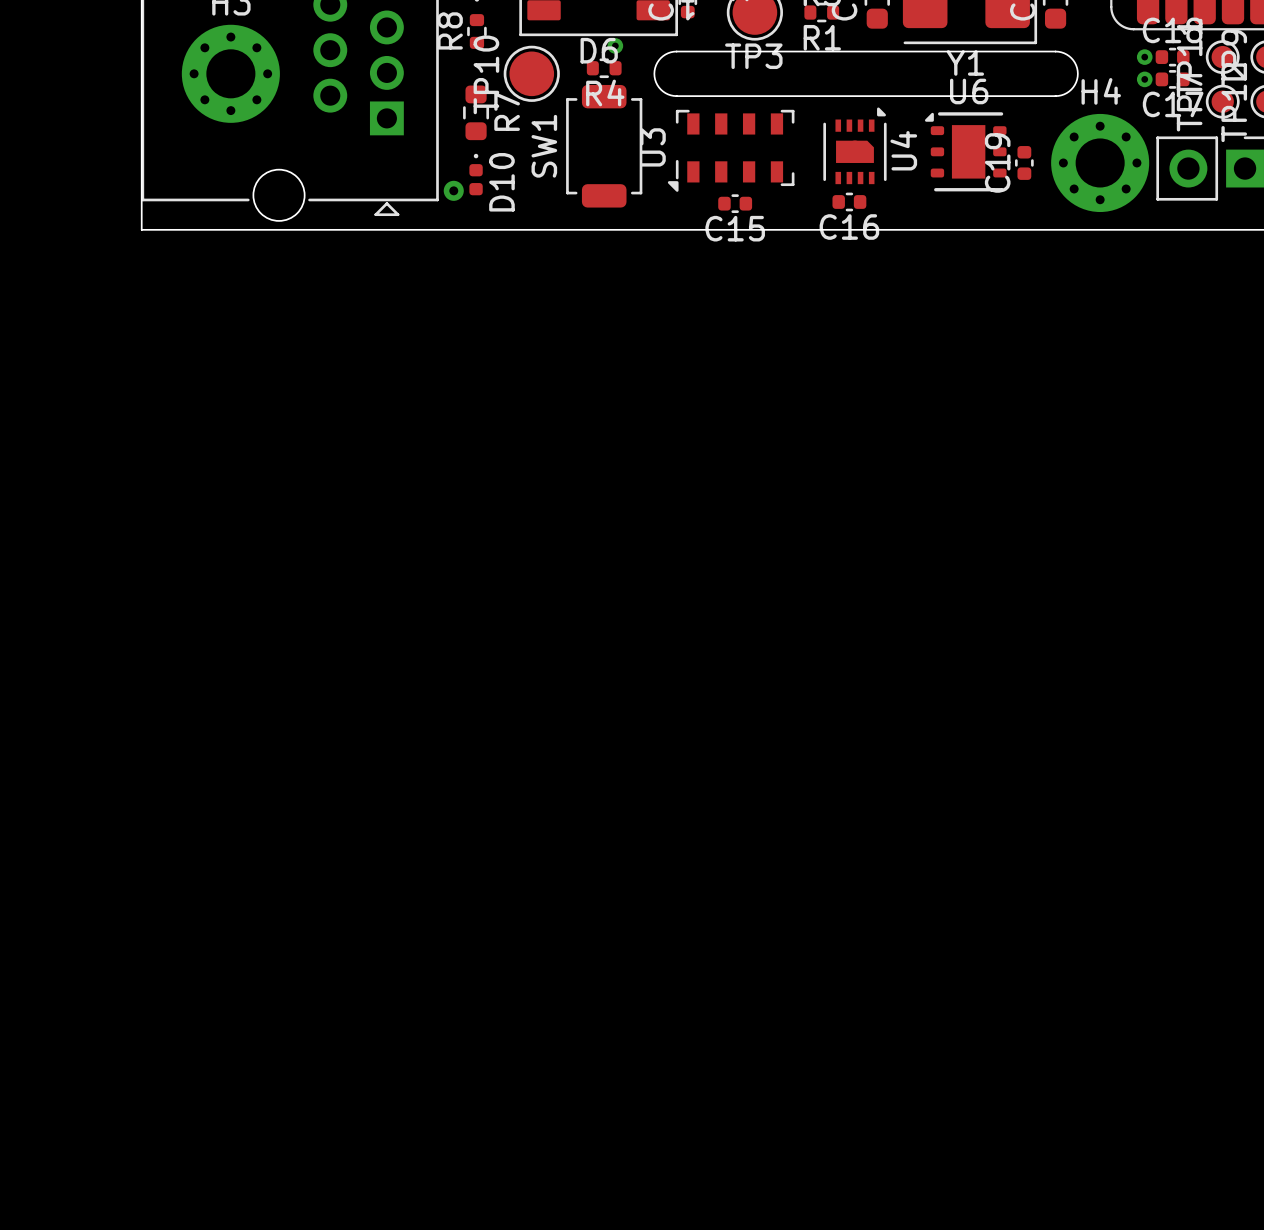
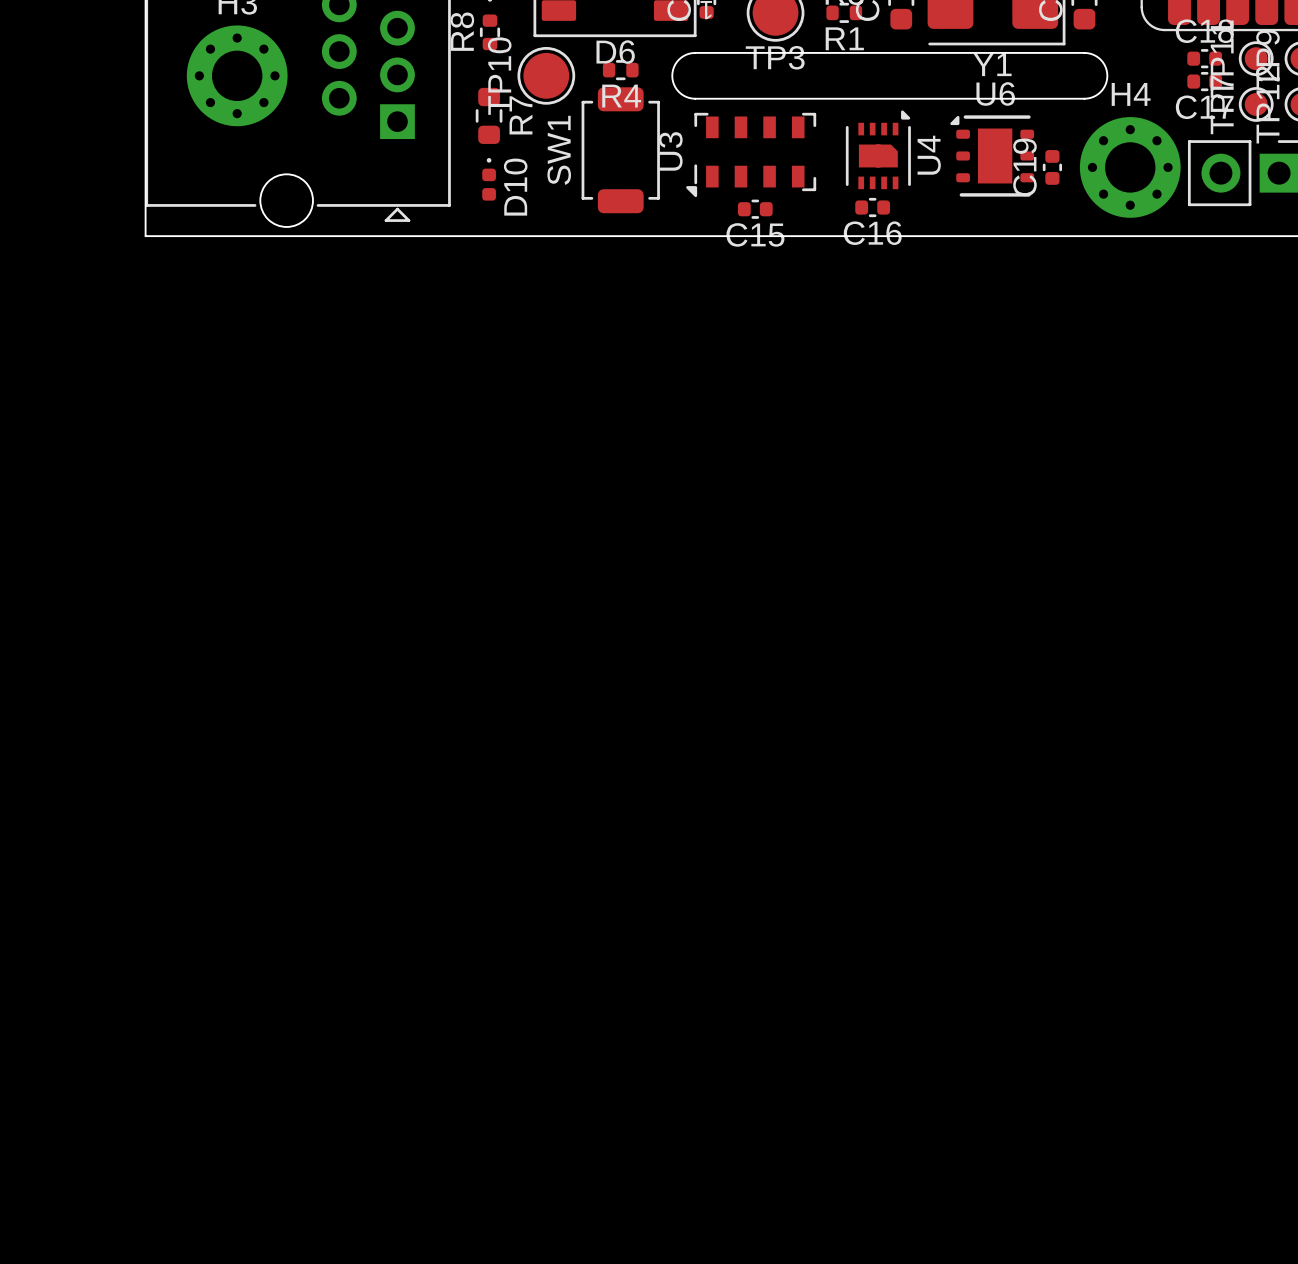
via: (615, 45) -> none
via: (1144, 57) -> none
via: (1144, 79) -> none
via: (453, 190) -> none

